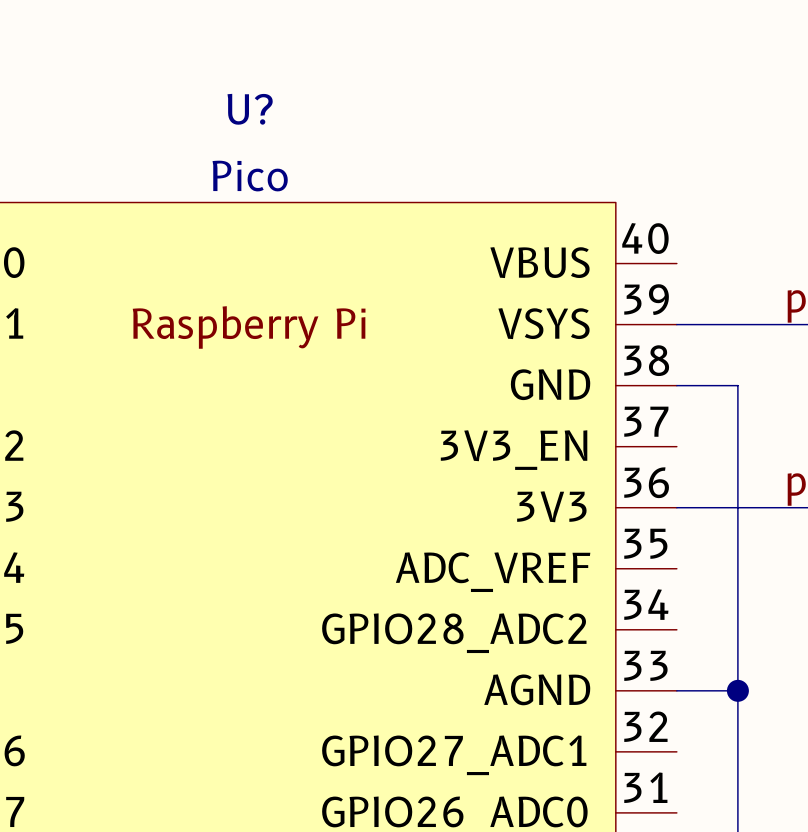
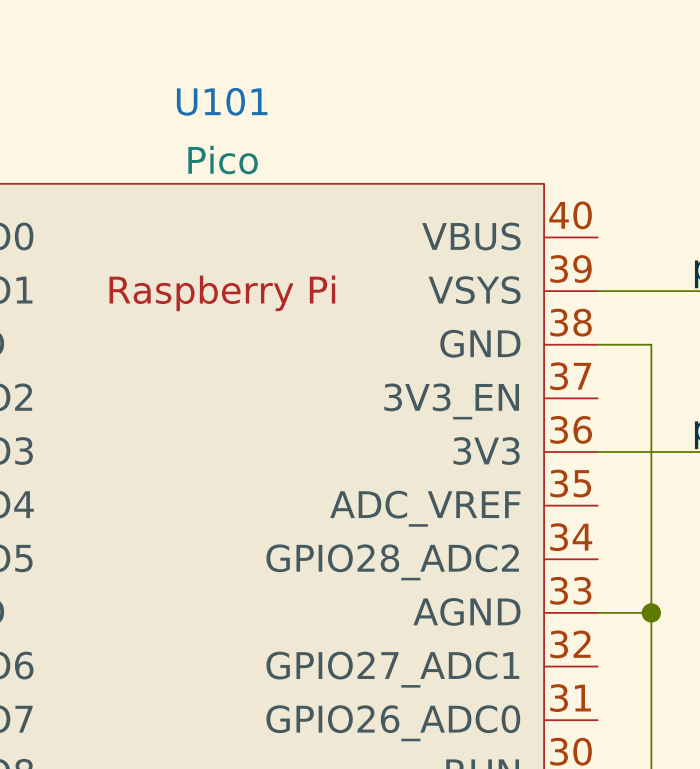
U? name: U? (250, 109) -> U101 (222, 101)

